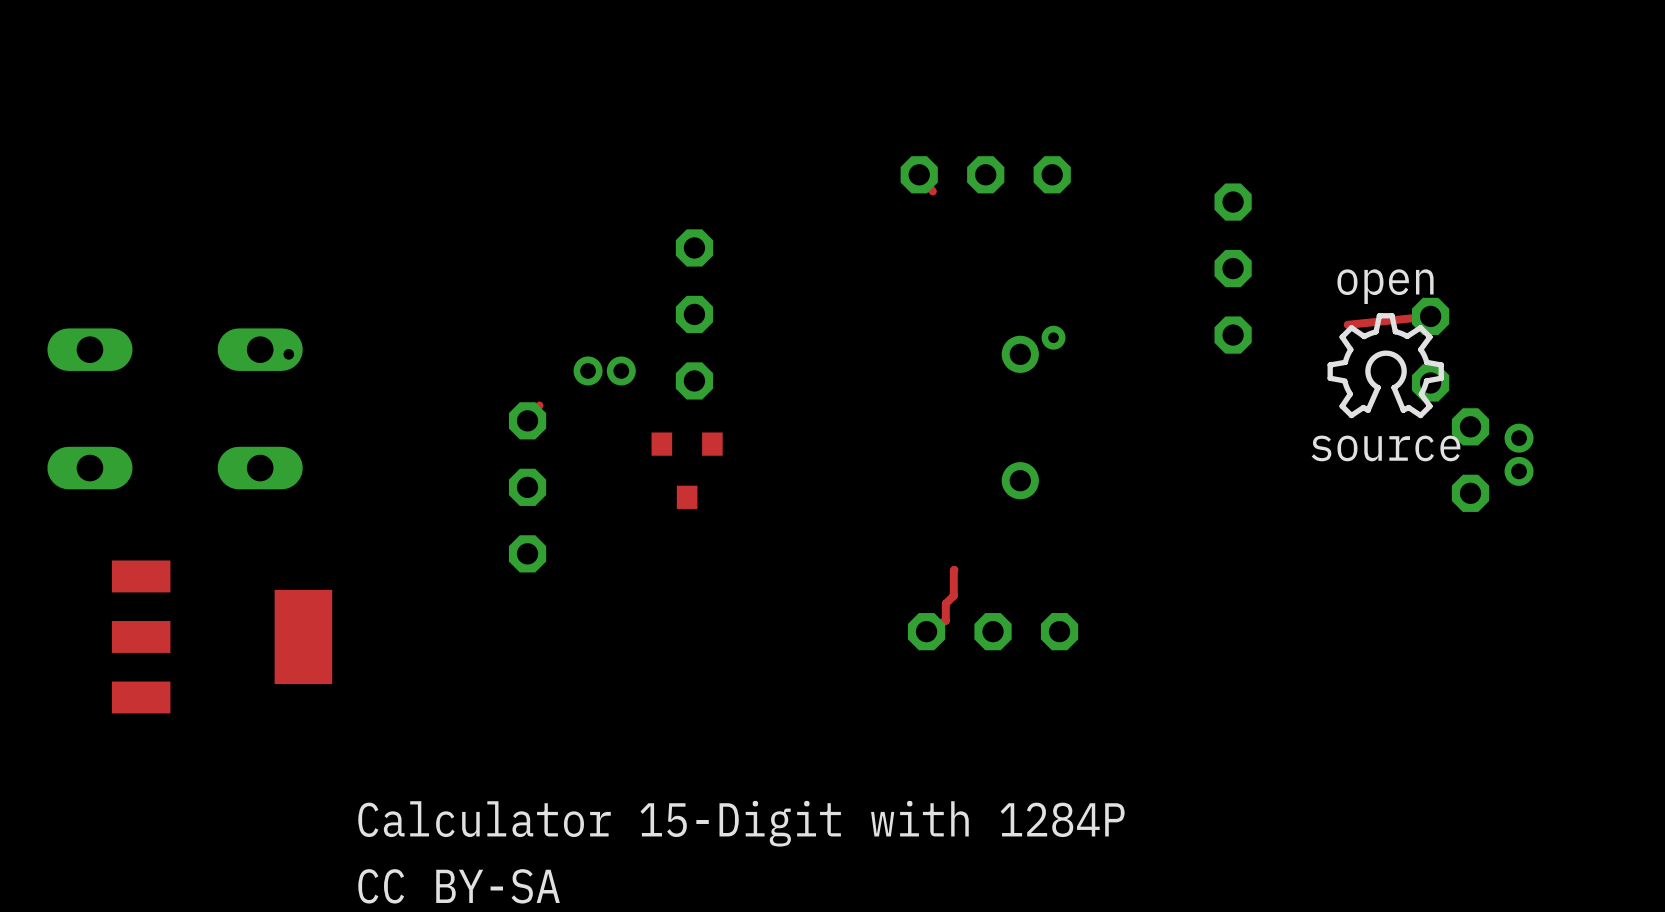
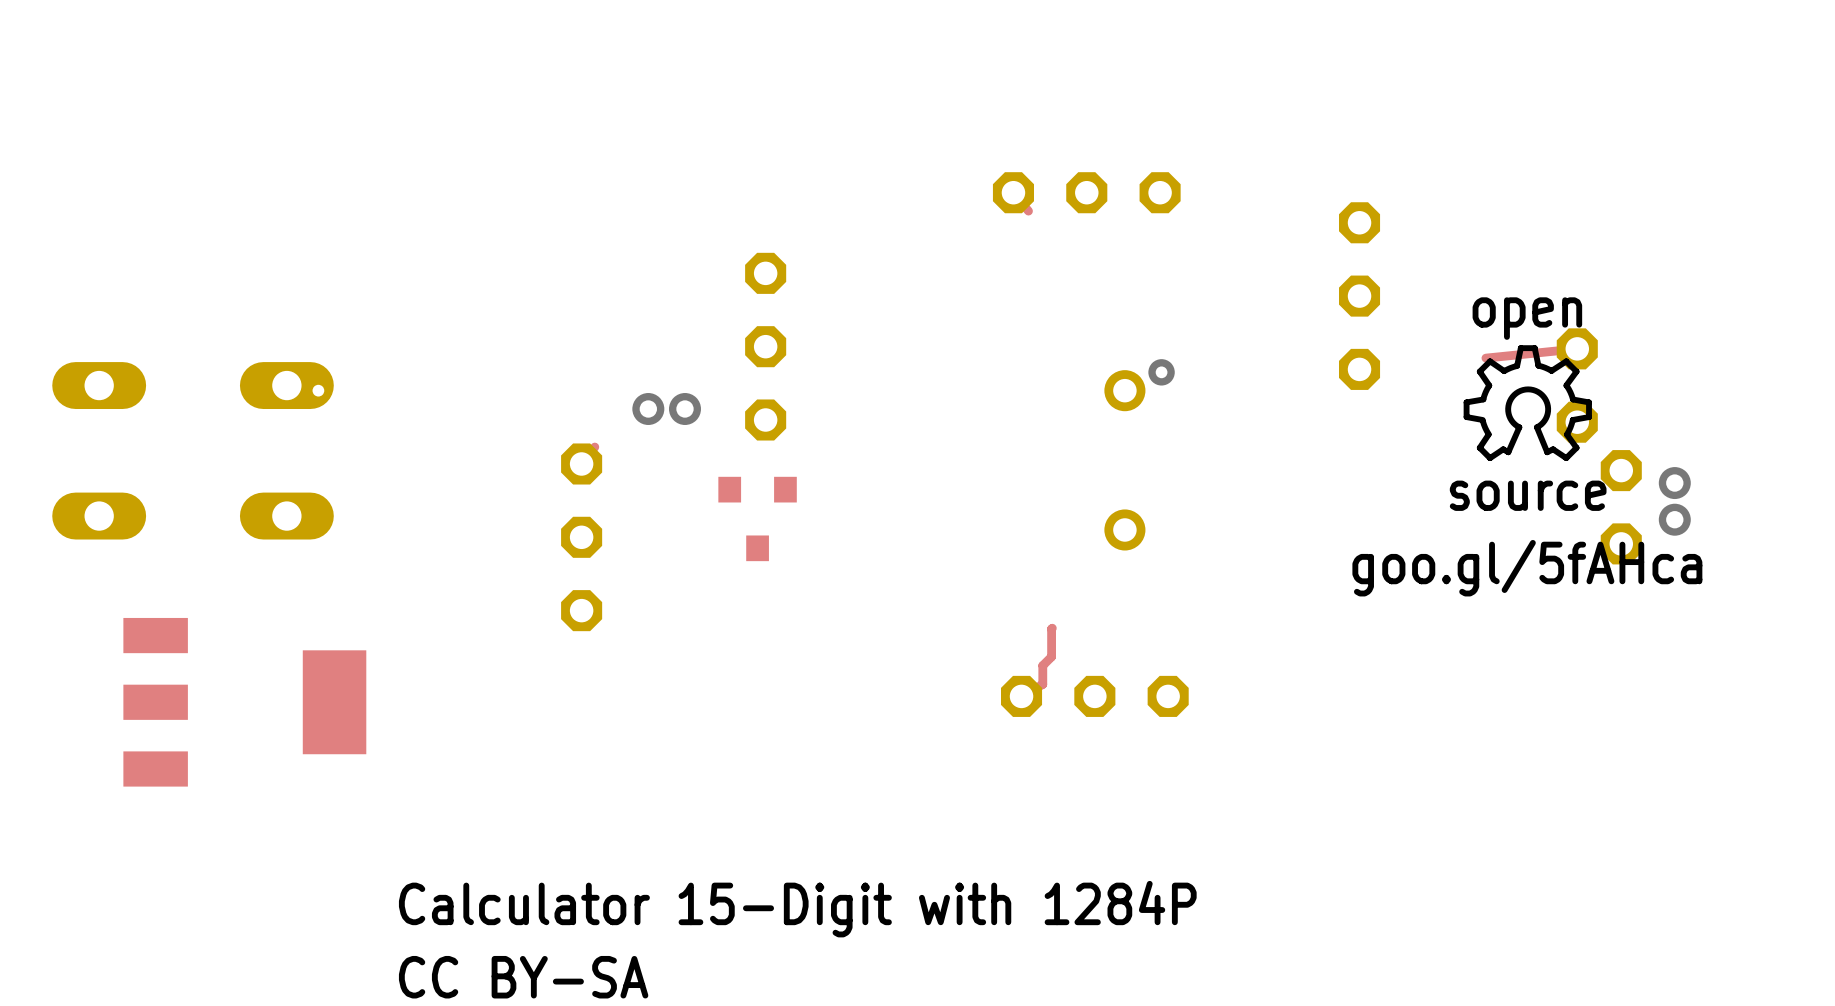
text: none -> goo.gl/5fAHca (1527, 568)

